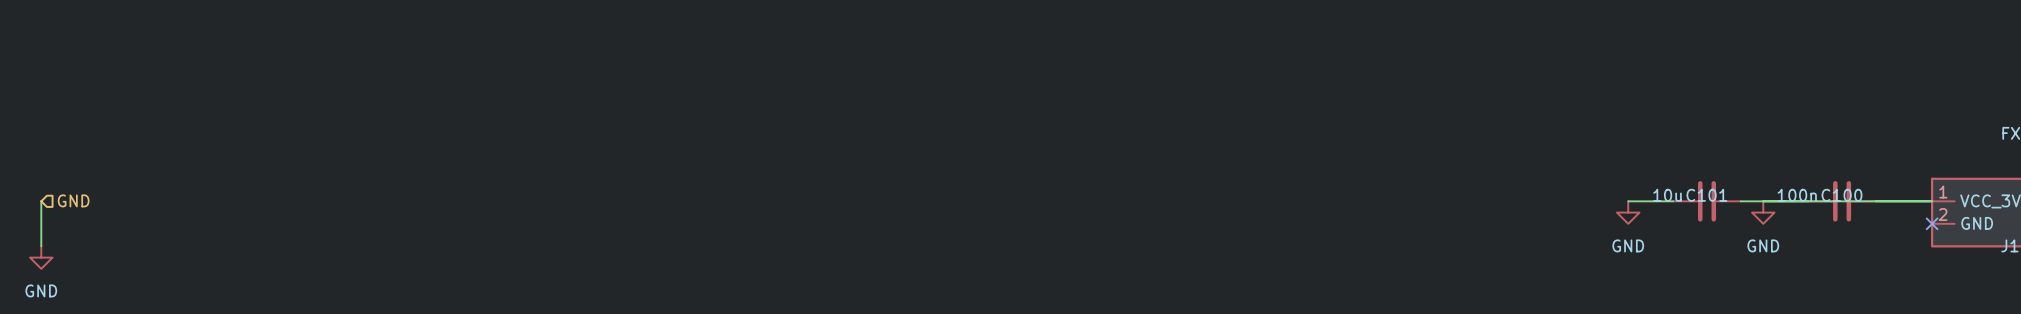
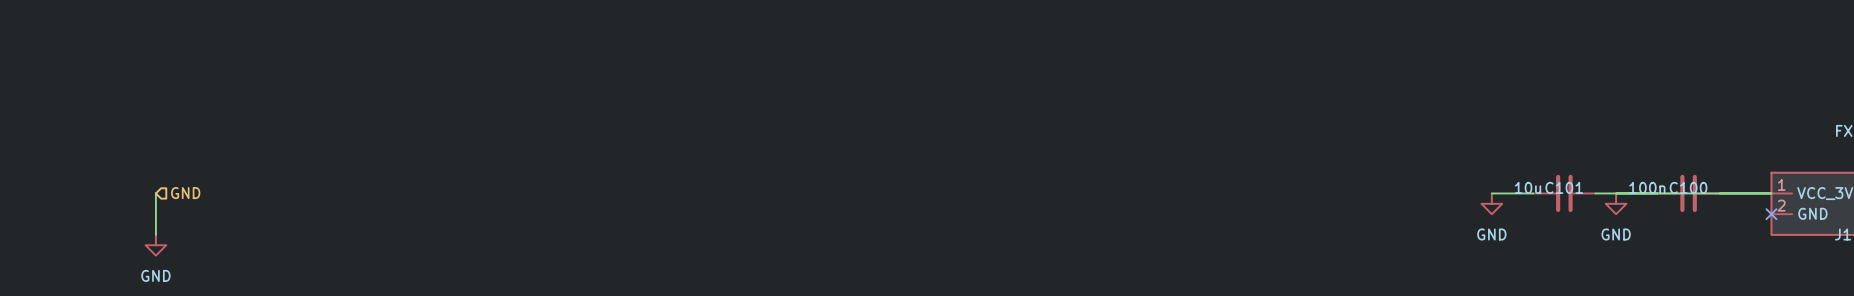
hierarchical label position: GND (73, 200) -> GND (185, 193)
wire: (41, 201) (41, 246) -> (155, 193) (155, 234)
power symbol position: GND (41, 257) -> GND (155, 245)

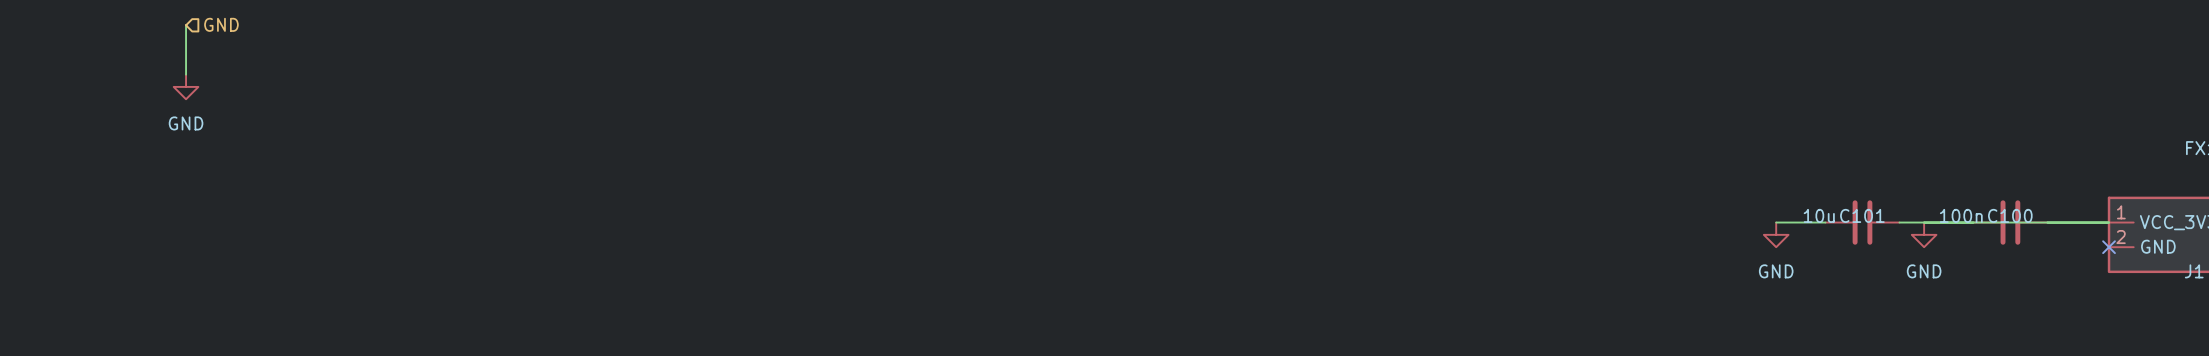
wire: (155, 193) (155, 234) -> (186, 25) (186, 74)
hierarchical label position: GND (185, 193) -> GND (221, 24)
power symbol position: GND (155, 245) -> GND (186, 86)

